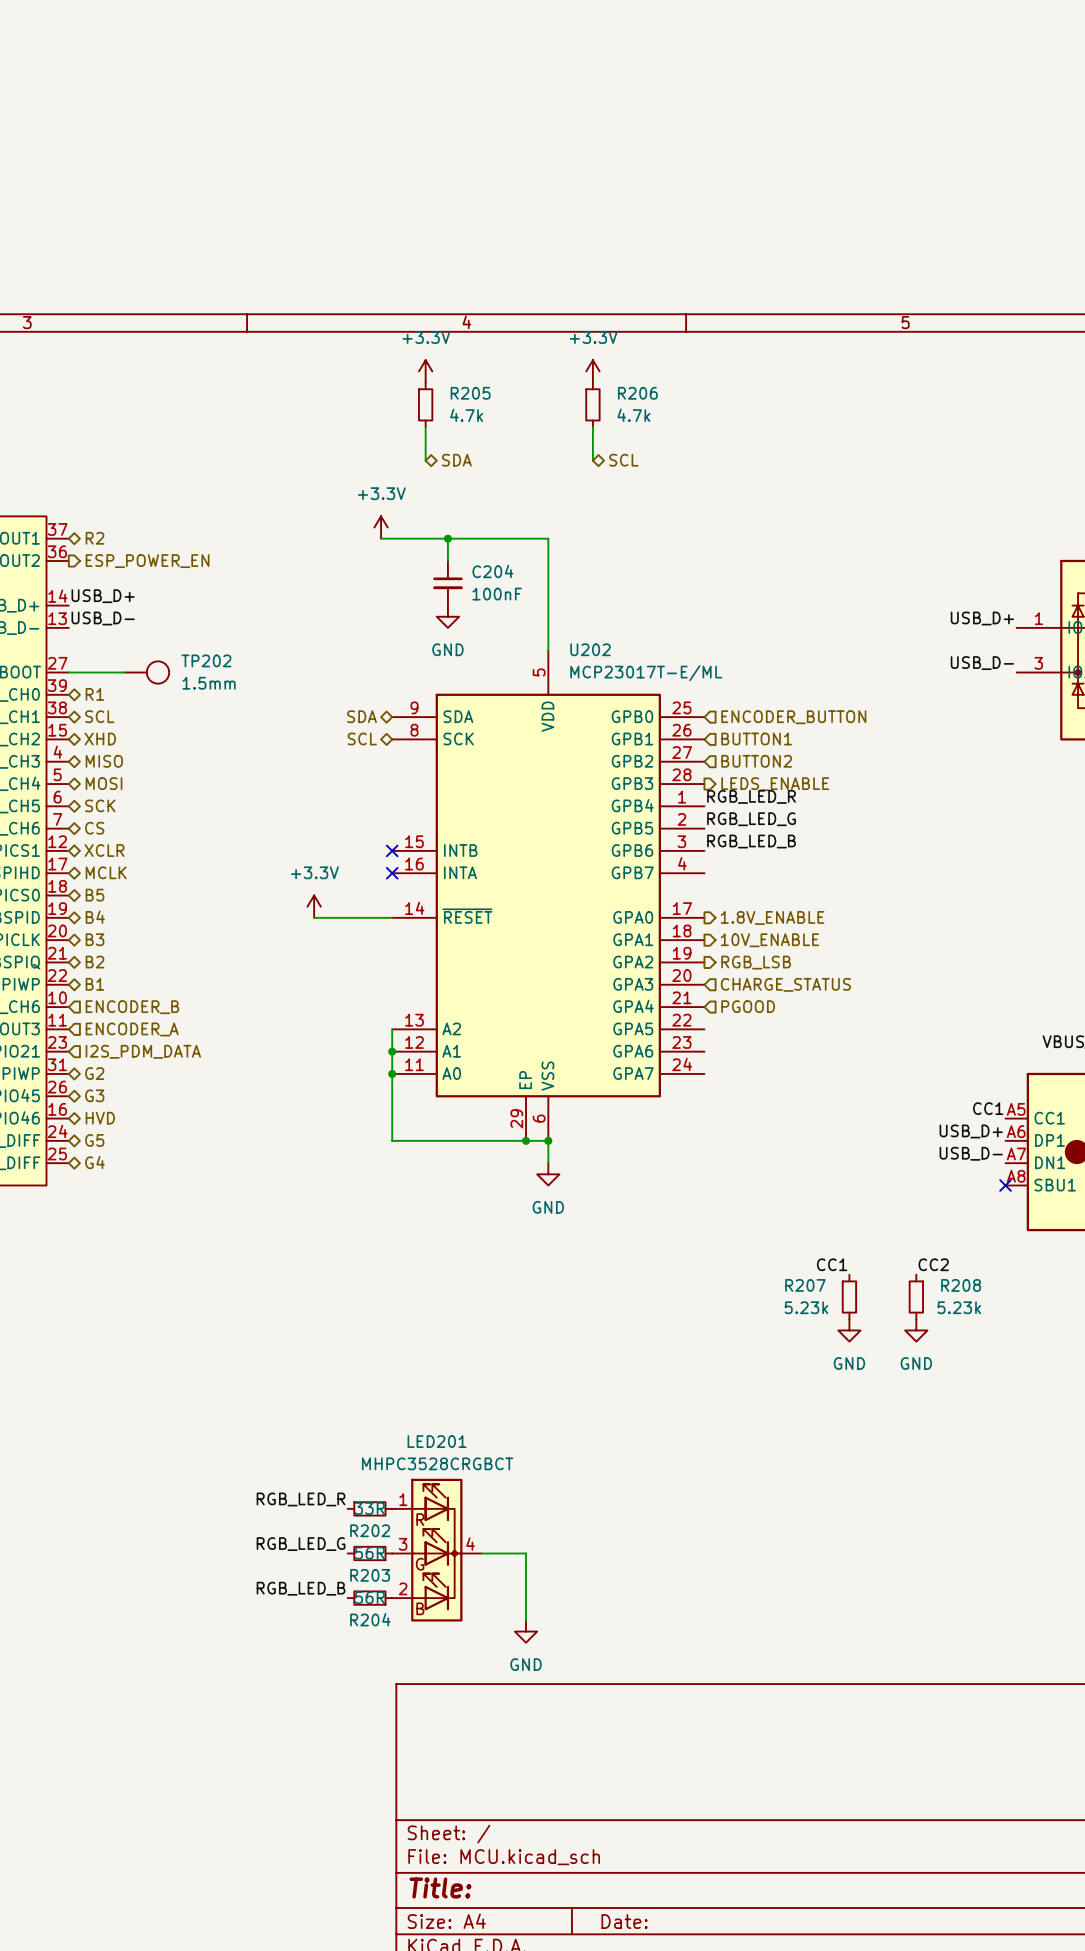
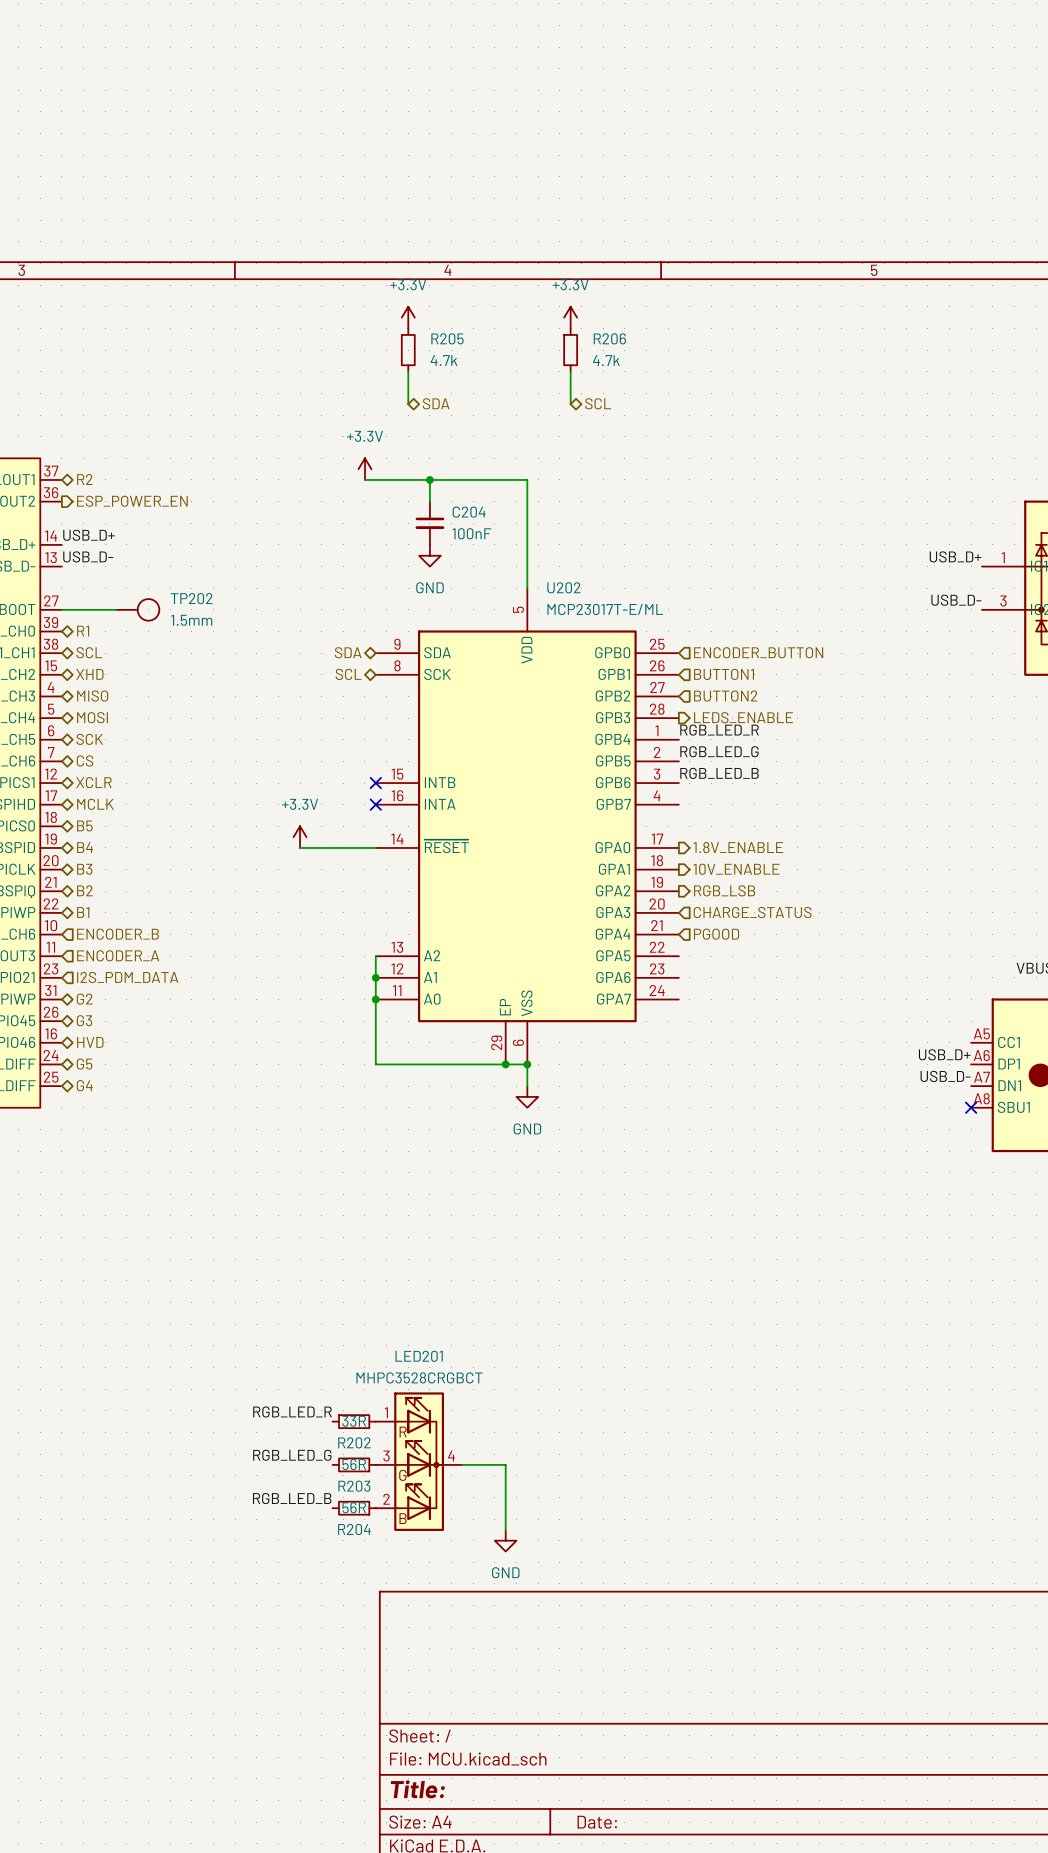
label: CC1 (988, 1108) -> none
label: CC1 (832, 1264) -> none
label: CC2 (933, 1264) -> none
R207: (849, 1297) -> none
R208: (916, 1297) -> none
power symbol: GND (849, 1330) -> none
power symbol: GND (916, 1330) -> none

